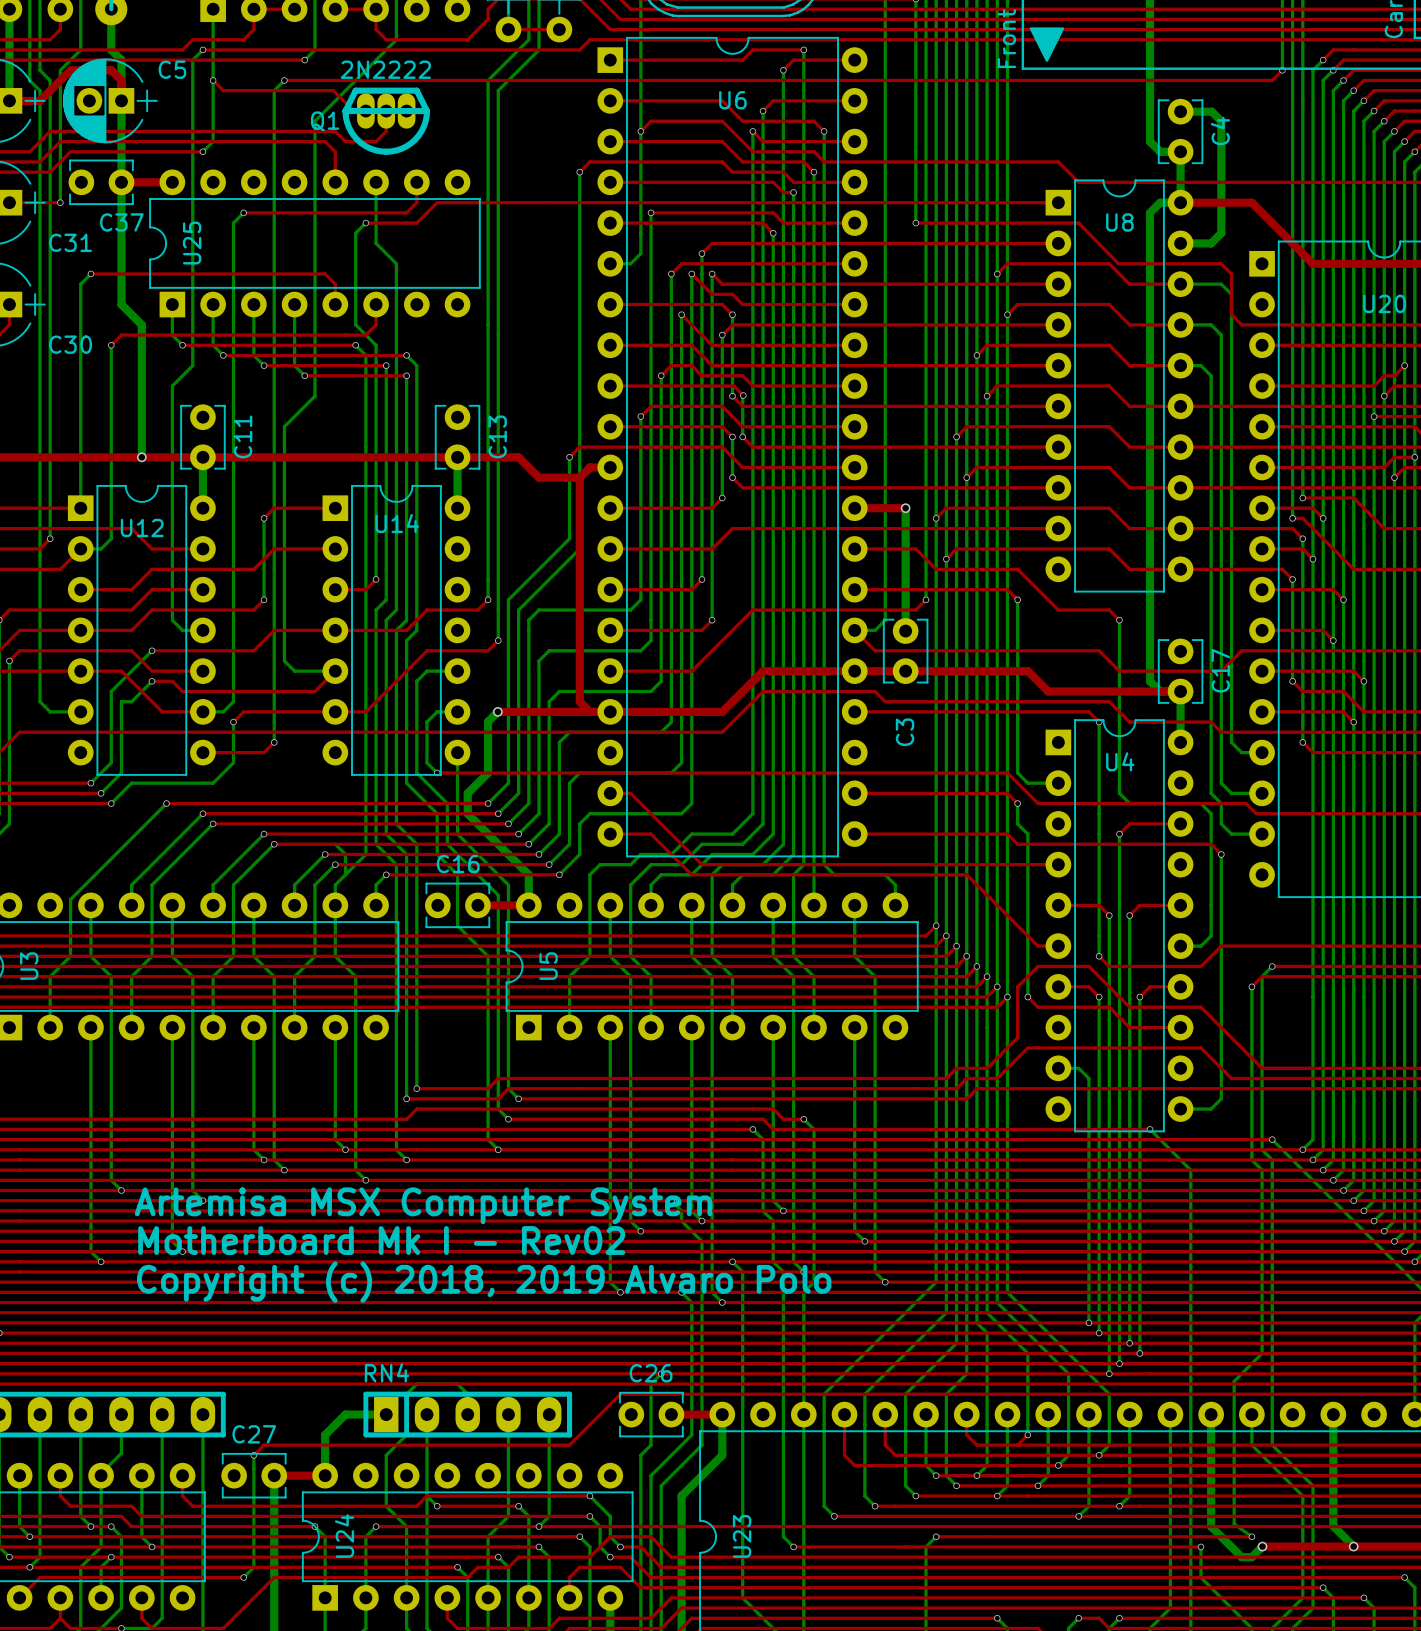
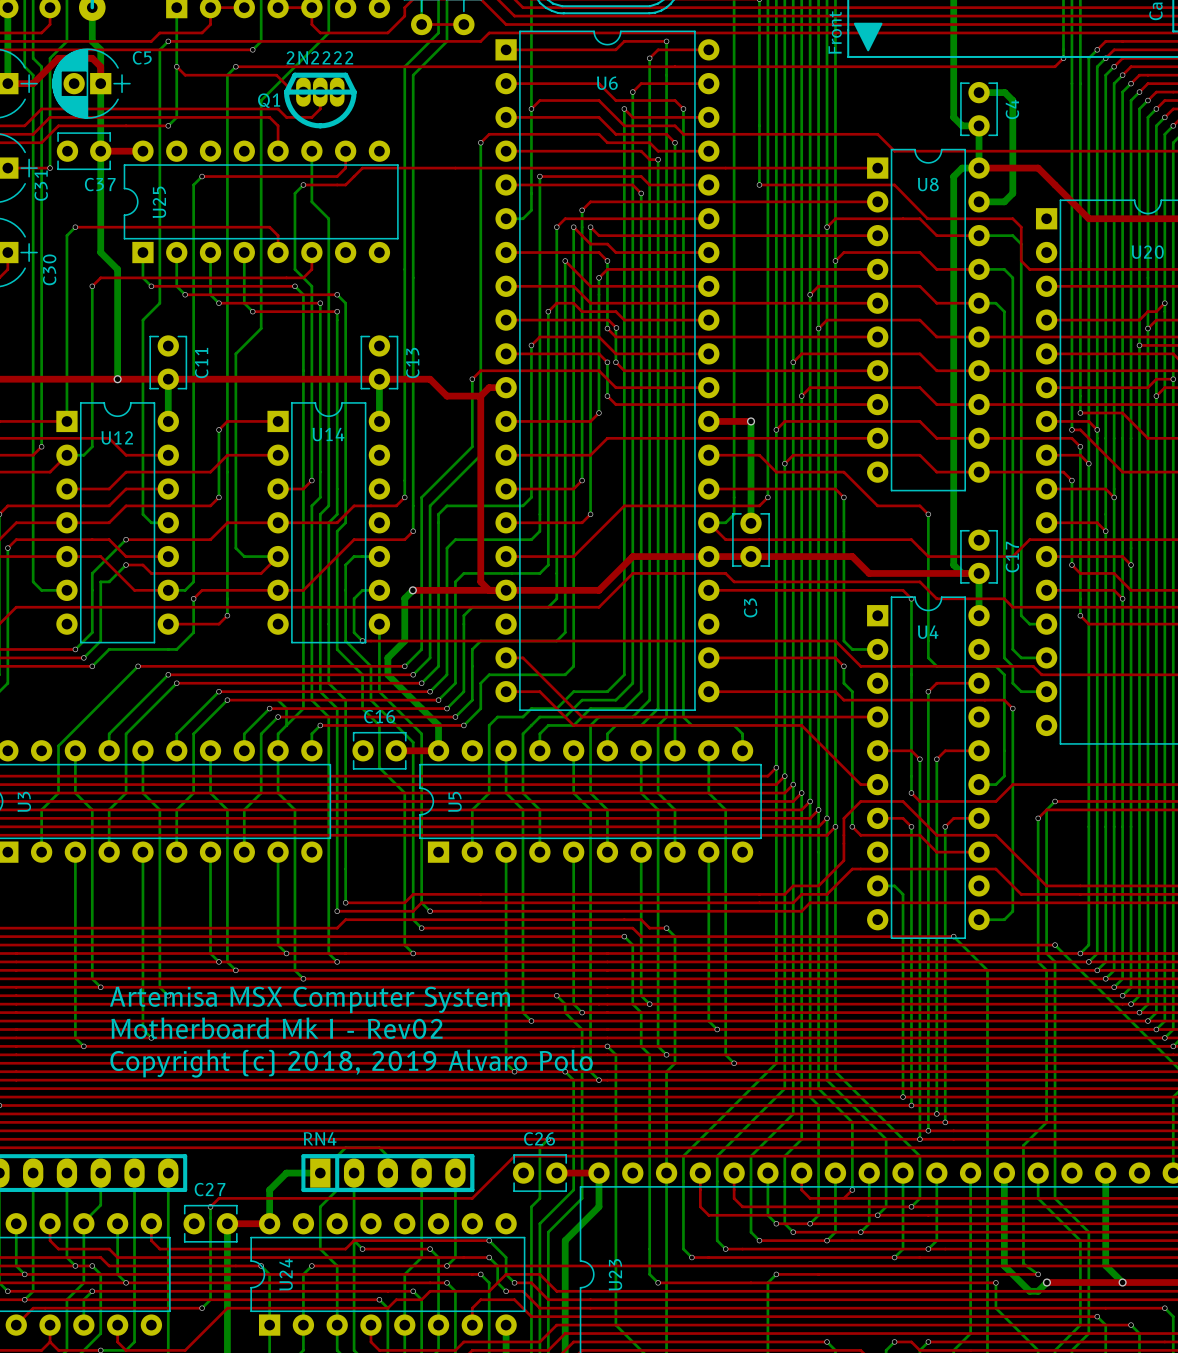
C31 name rotation: 0° (70, 242) -> 90° counterclockwise (41, 185)
C30 name rotation: 0° (70, 344) -> 90° counterclockwise (49, 269)

